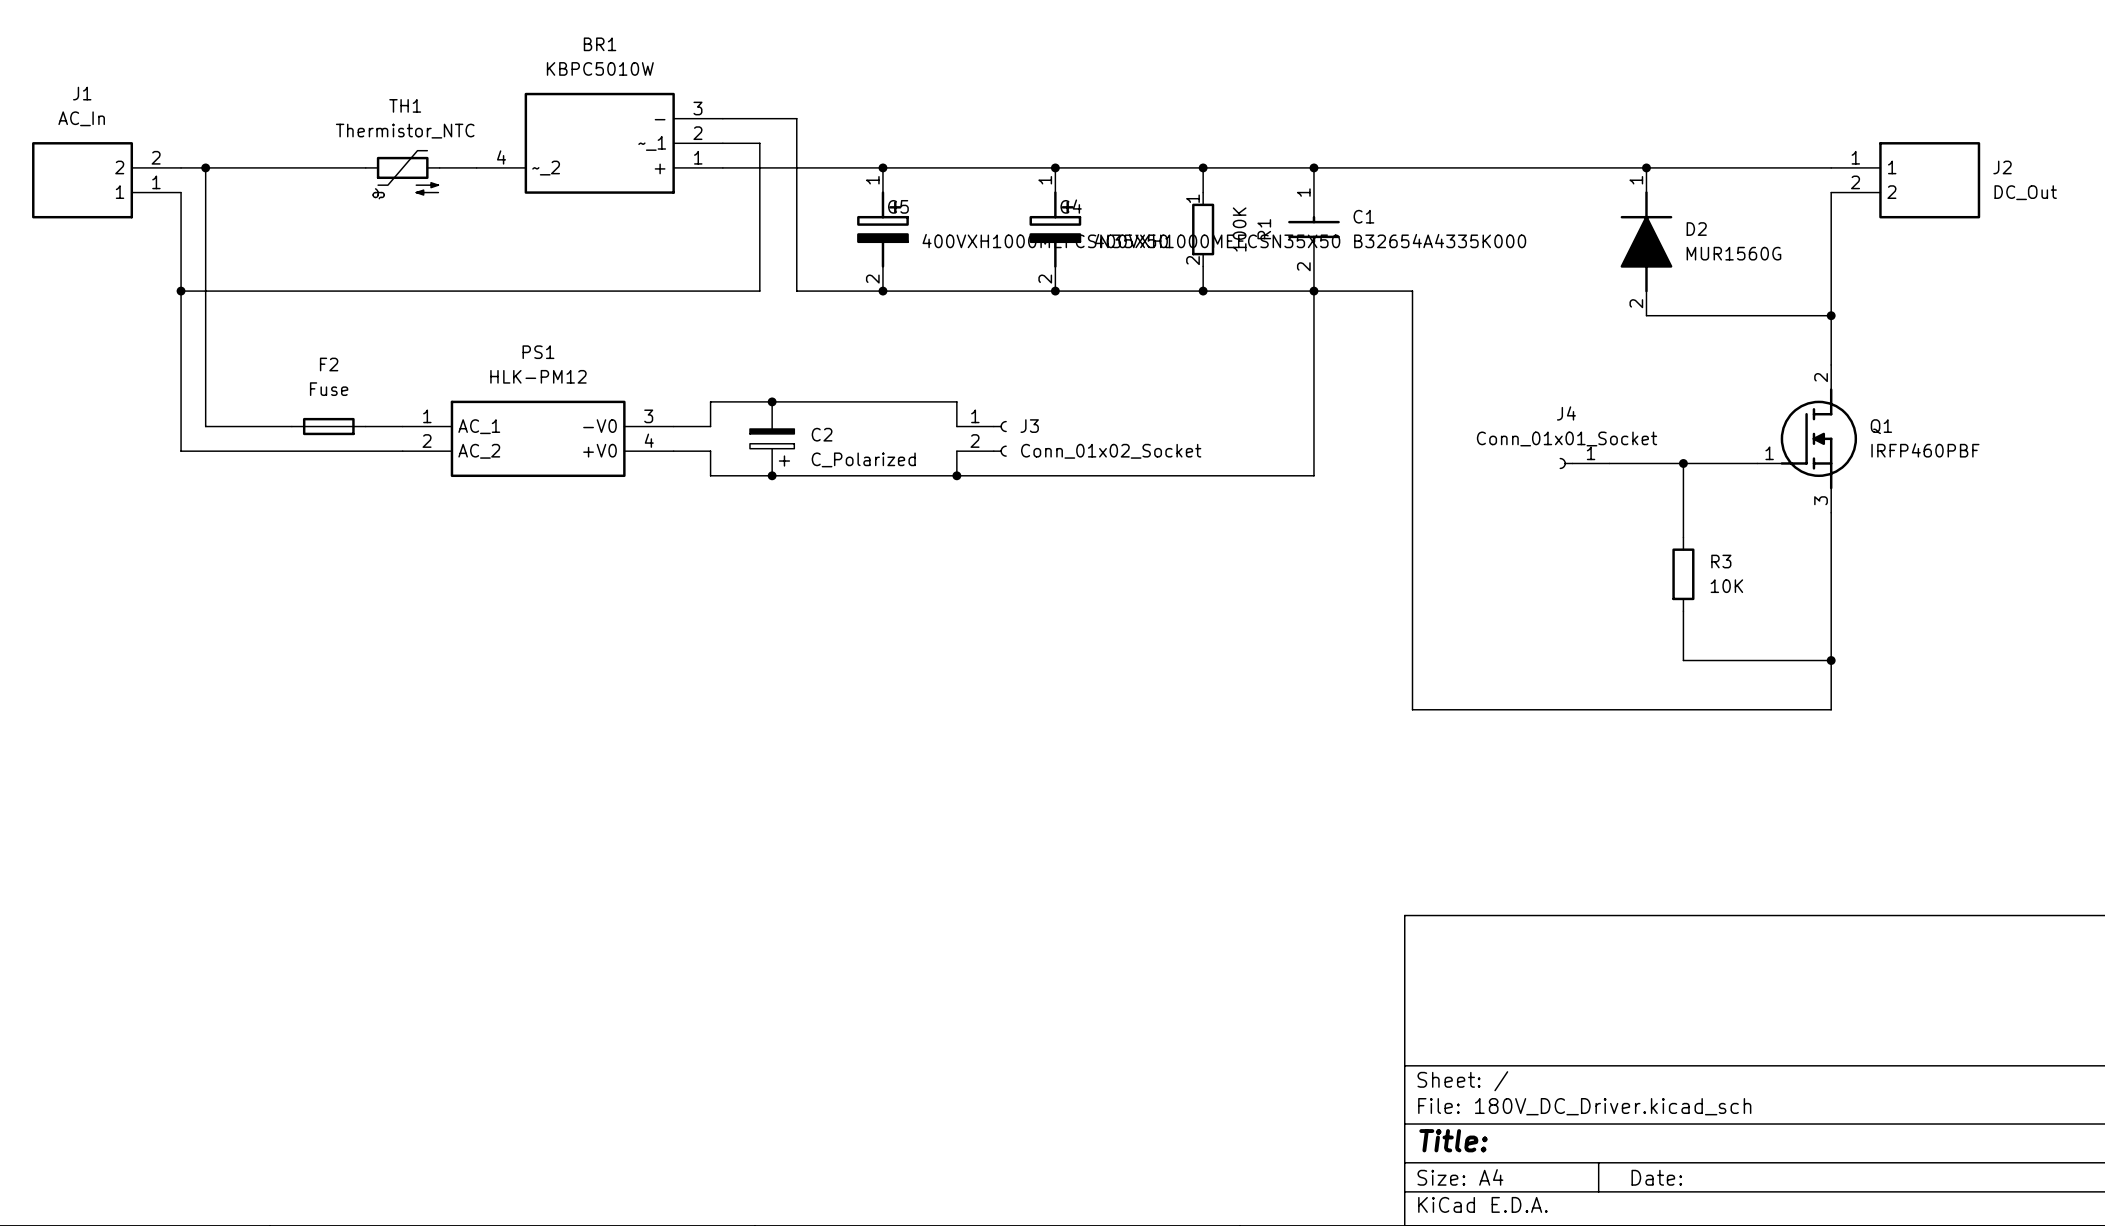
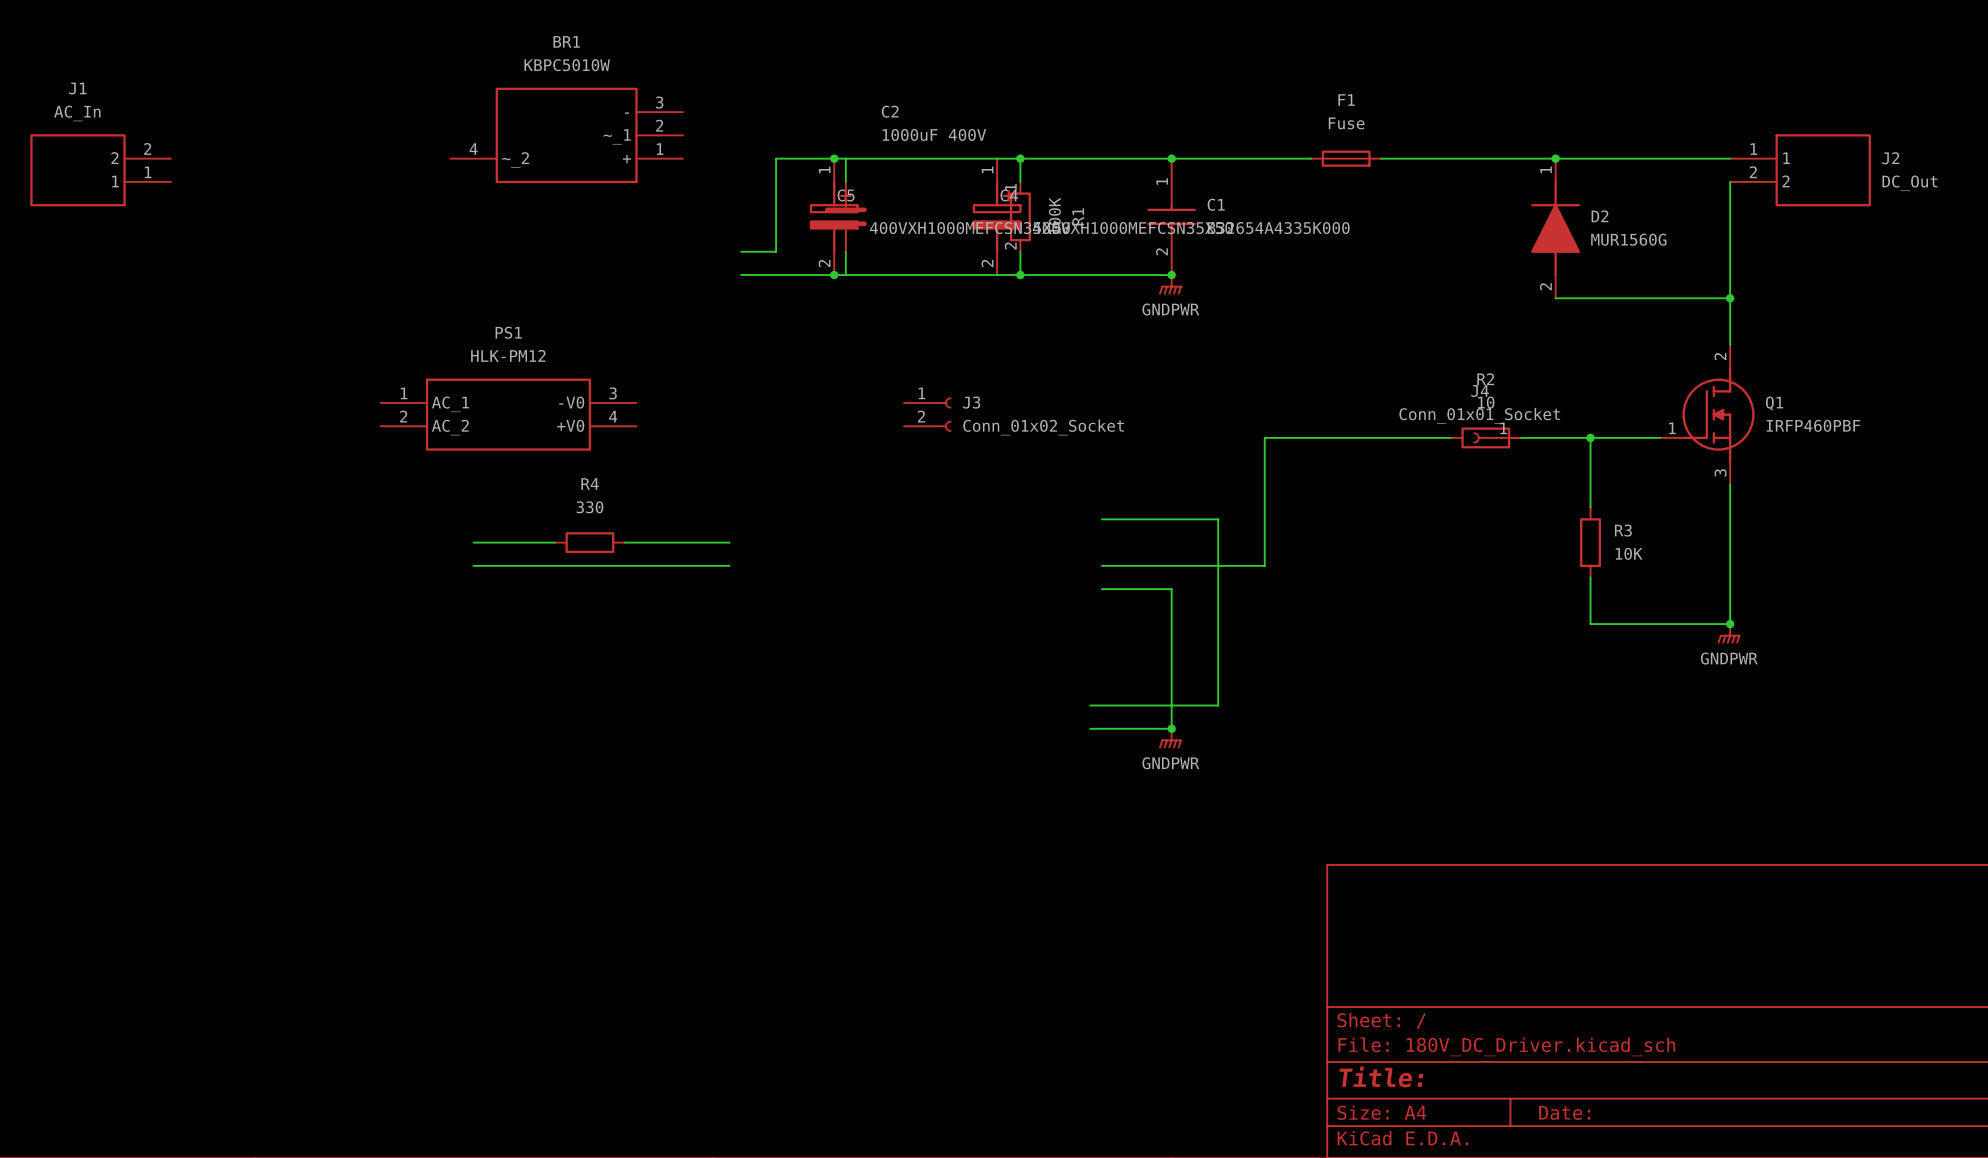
wire: (722, 118) (796, 118) (796, 291) -> (741, 275) (752, 275)
wire: (722, 143) (759, 143) (759, 291) (181, 291) -> none
wire: (181, 167) (365, 167) -> none
wire: (205, 167) (205, 426) (291, 426) -> none
junction: (205, 167) -> none
wire: (439, 167) (476, 167) -> none
wire: (722, 167) (821, 167) -> (741, 251) (776, 251) (776, 158)
wire: none -> (845, 158) (845, 181)
junction position: (1055, 167) -> (1020, 158)
wire: (1203, 167) (1203, 192) -> (1020, 158) (1020, 181)
junction: (1203, 167) -> none
junction: none -> (1171, 158)
junction: (1313, 167) -> none
F1: none -> Fuse (1346, 158)
TH1: Thermistor_NTC (402, 174) -> none
wire: (181, 192) (181, 451) (402, 451) -> none
R1 position: (1203, 229) -> (1020, 216)
C1 position: (1313, 229) -> (1171, 216)
wire: (1203, 266) (1203, 291) -> (1020, 251) (1020, 275)
junction: (181, 291) -> none
junction position: (1055, 291) -> (1020, 275)
junction: (1203, 291) -> none
wire: (1240, 291) (1412, 291) (1412, 709) (1831, 709) (1831, 660) -> none
junction: none -> (1171, 275)
wire: (1313, 291) (1313, 475) (710, 475) (710, 451) (673, 451) -> none
junction: (1313, 291) -> none
power symbol: none -> GNDPWR (1170, 284)
C2 symbol: [749, 401, 795, 476] -> [824, 181, 867, 252]
junction: (772, 401) -> none
F2: Fuse (328, 426) -> none
wire: (365, 426) (402, 426) -> none
wire: (673, 426) (710, 426) (710, 401) (956, 401) (956, 426) -> none
C2 name position: C2 (822, 434) -> C2 (890, 111)
wire: (956, 451) (956, 475) -> (845, 251) (845, 275)
C2 value: C_Polarized (863, 459) -> 1000uF 400V (934, 134)
wire: none -> (1450, 437) (1264, 437) (1264, 565) (1101, 565)
R2: none -> 10 (1485, 437)
junction: (772, 475) -> none
junction: (956, 475) -> none
wire: none -> (1101, 519) (1218, 519) (1218, 705) (1090, 705)
wire: none -> (473, 542) (555, 542)
R4: none -> 330 (589, 542)
wire: none -> (624, 542) (729, 542)
wire: none -> (473, 565) (729, 565)
wire: none -> (1101, 589) (1171, 589) (1171, 728) (1090, 728)
power symbol: none -> GNDPWR (1728, 633)
junction: none -> (1171, 728)
power symbol: none -> GNDPWR (1170, 738)

